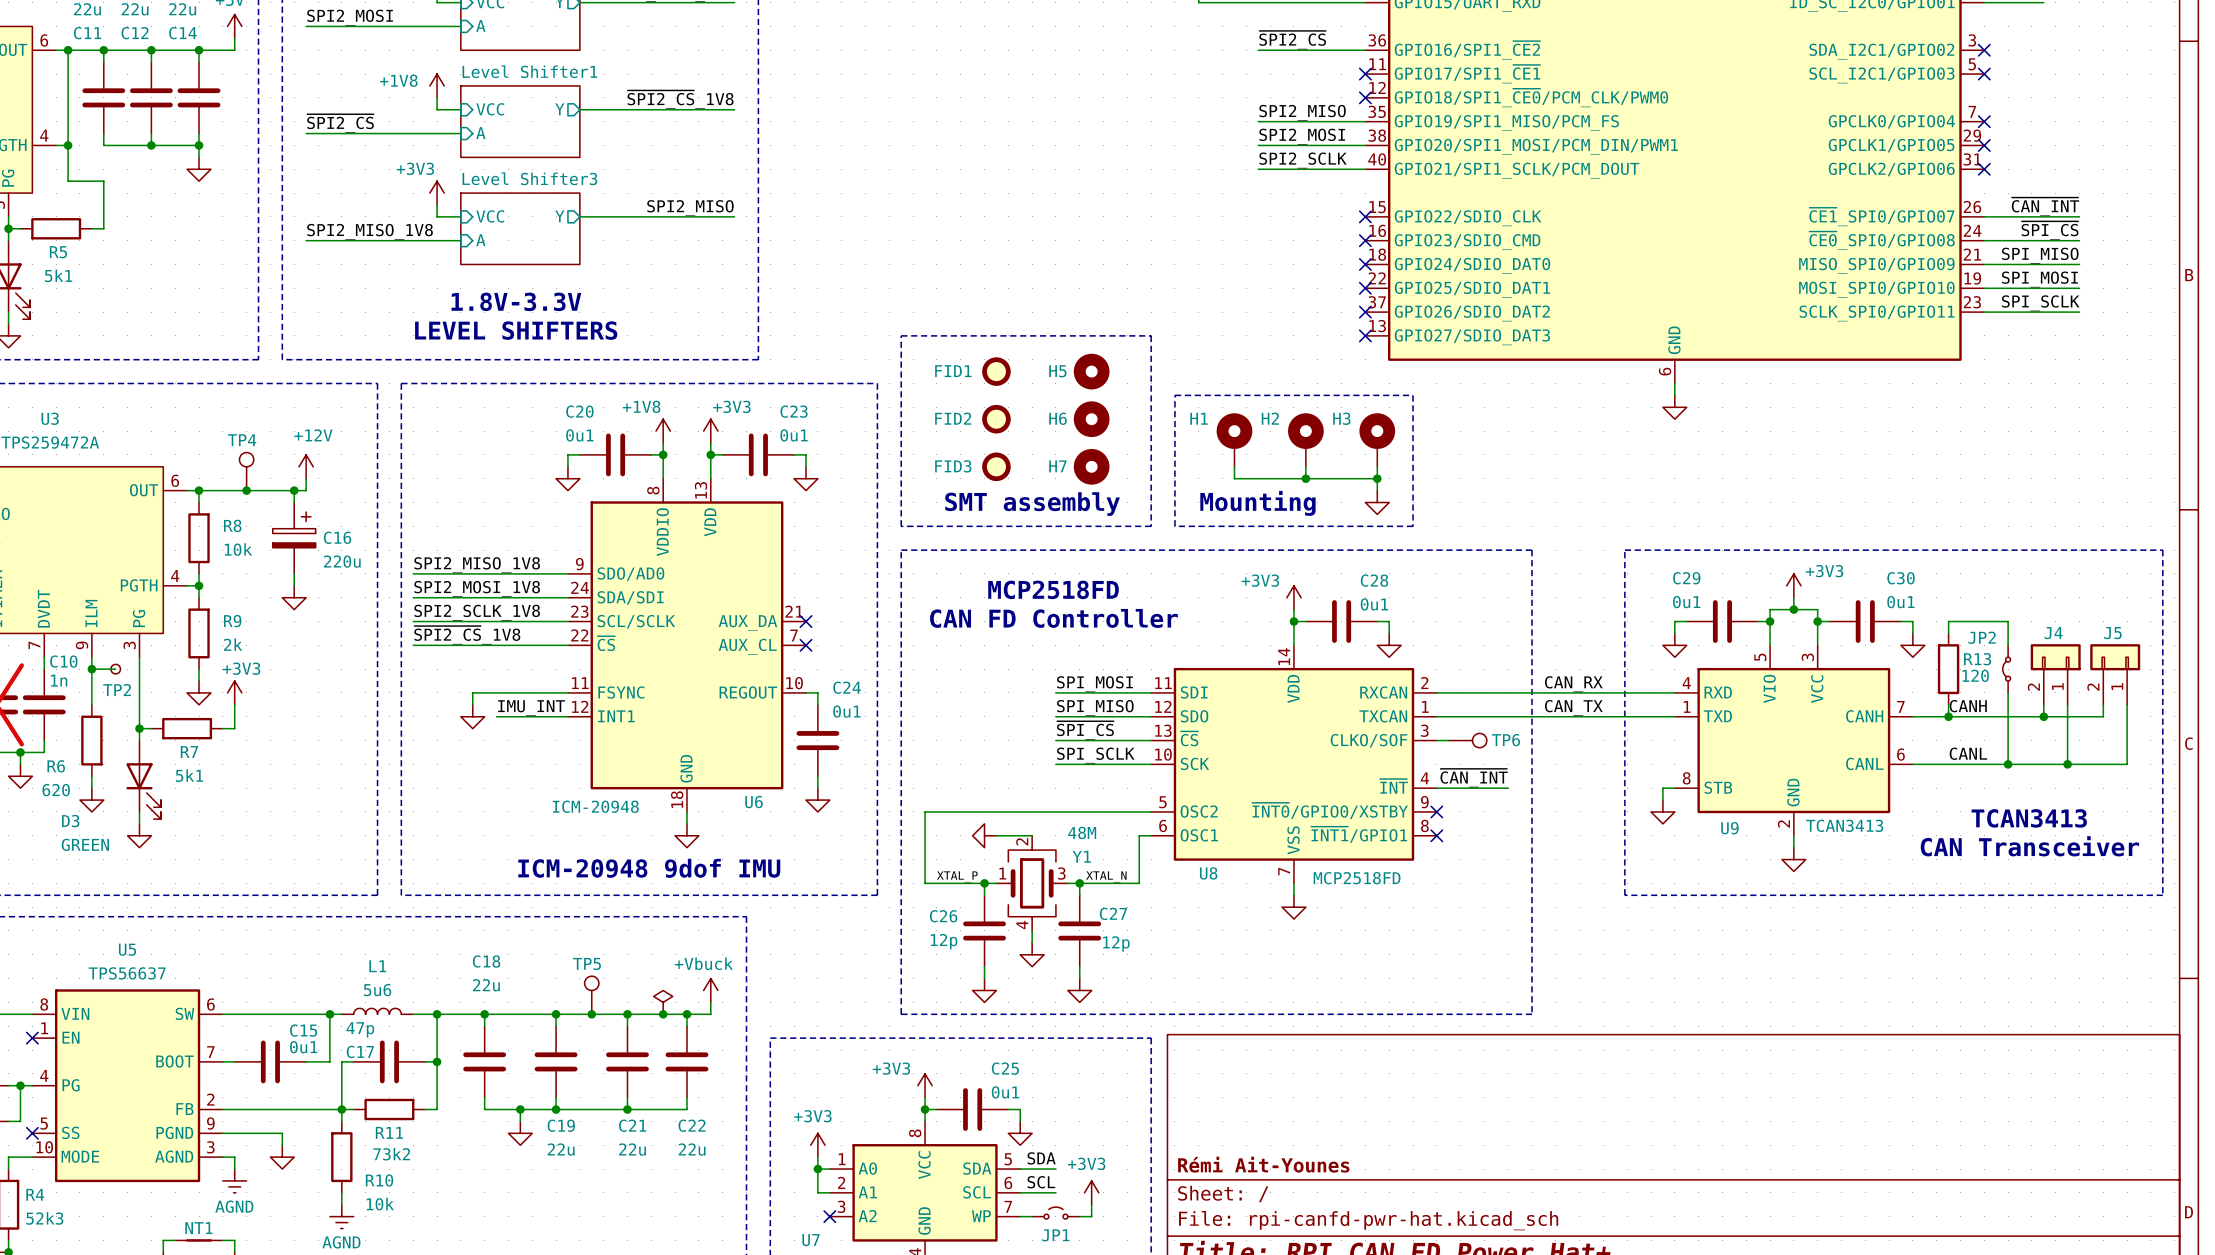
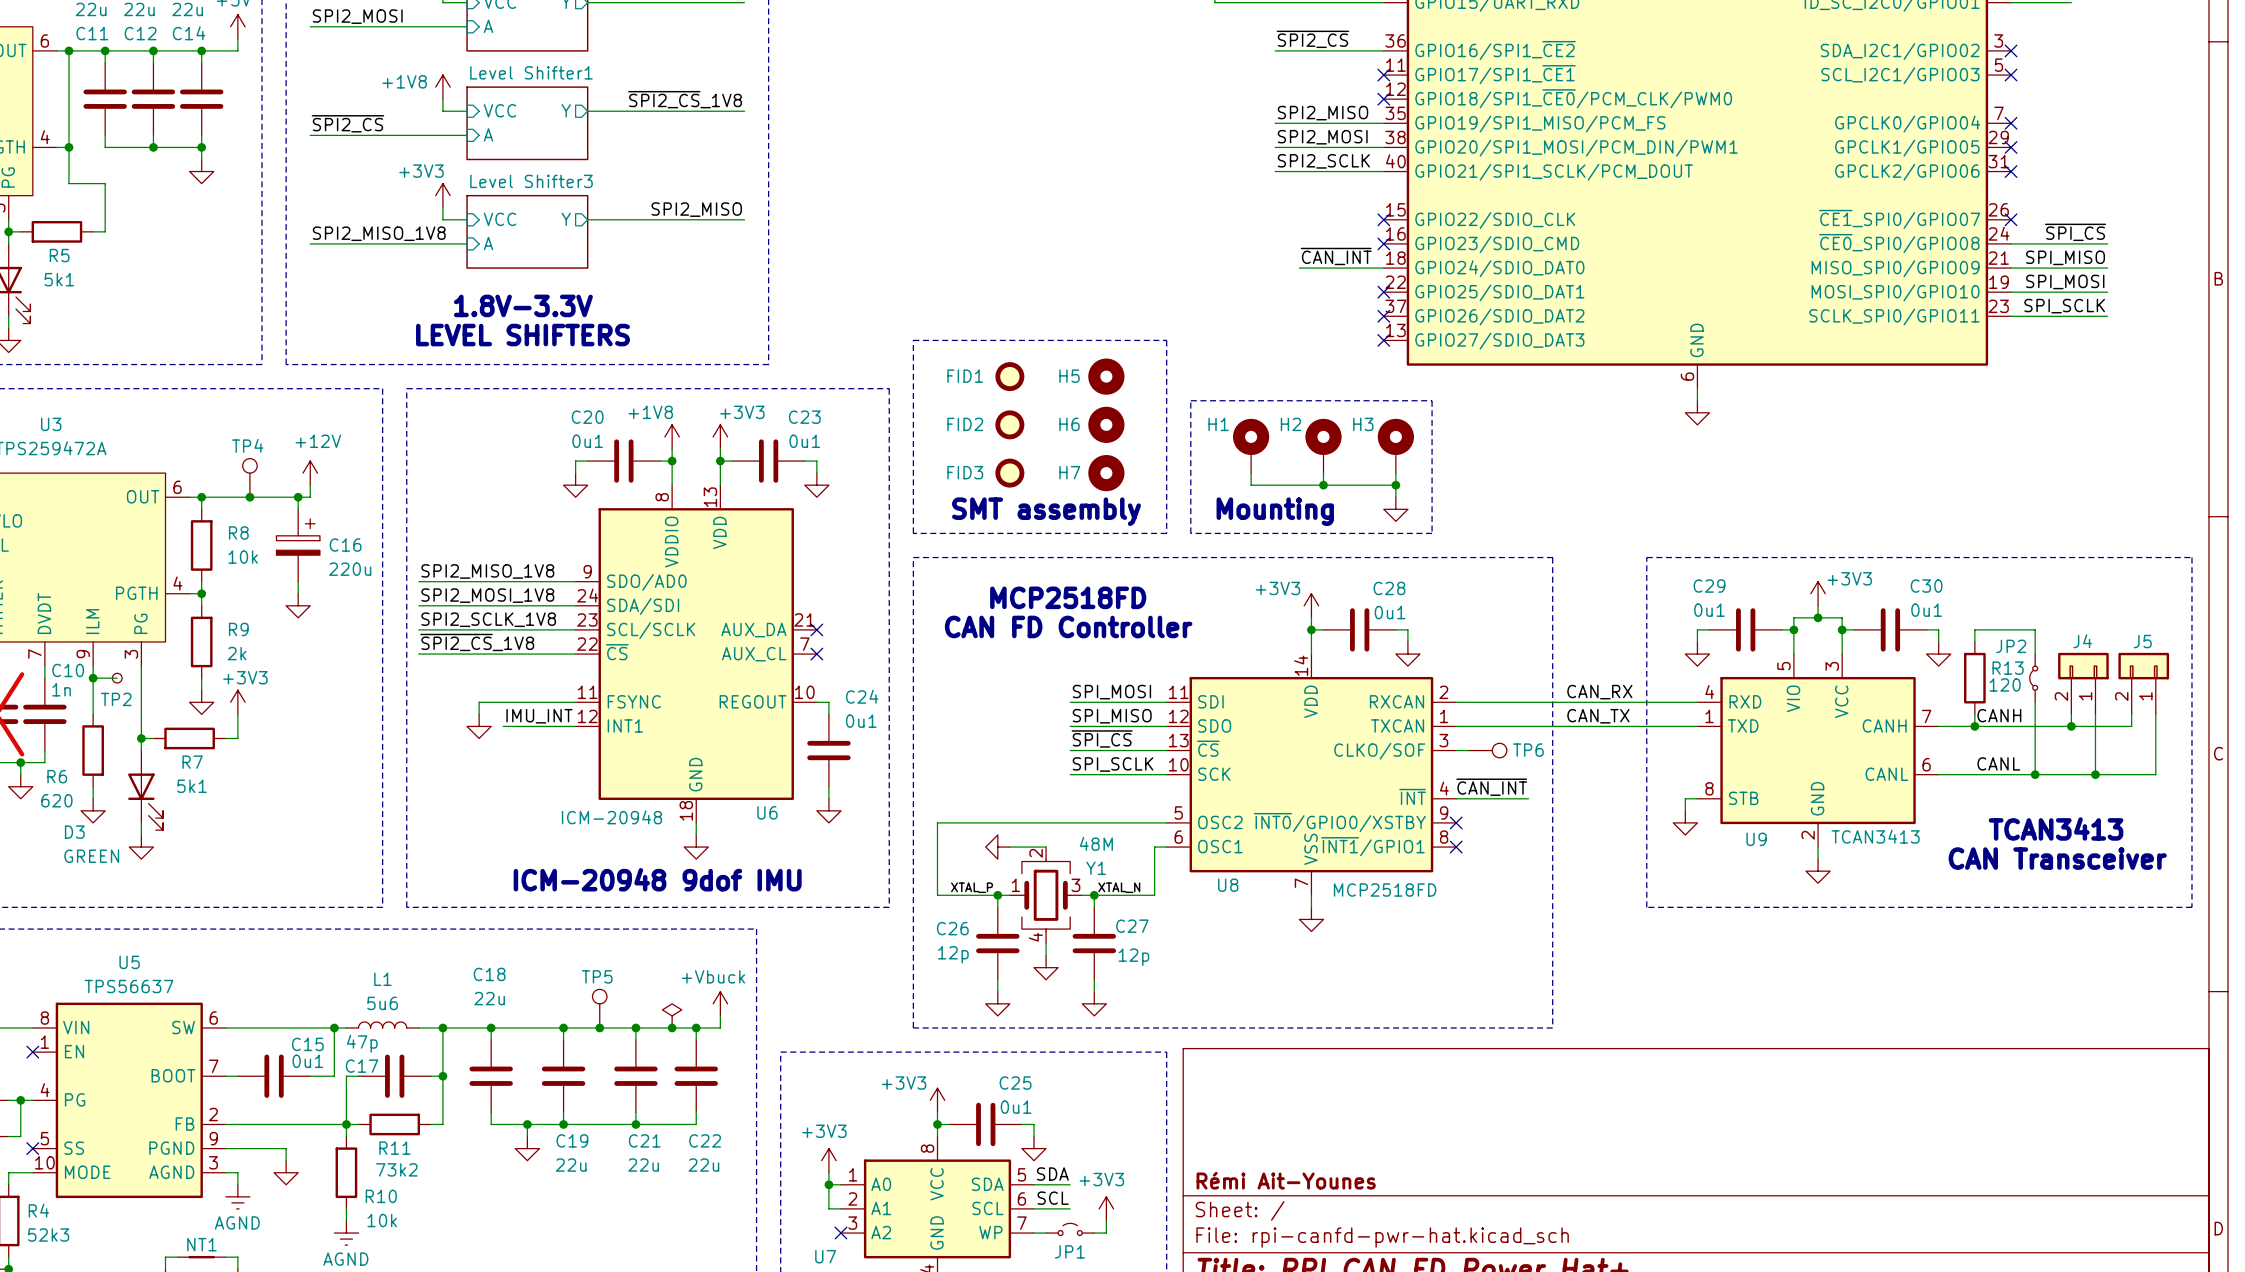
label: ~{CAN_INT} (2045, 206) -> none
wire: (1984, 216) (2079, 216) -> none
no-connect mark: none -> (2011, 219)
label: none -> ~{CAN_INT} (1336, 256)
wire: none -> (1299, 268) (1383, 268)
no-connect mark: (1365, 264) -> none

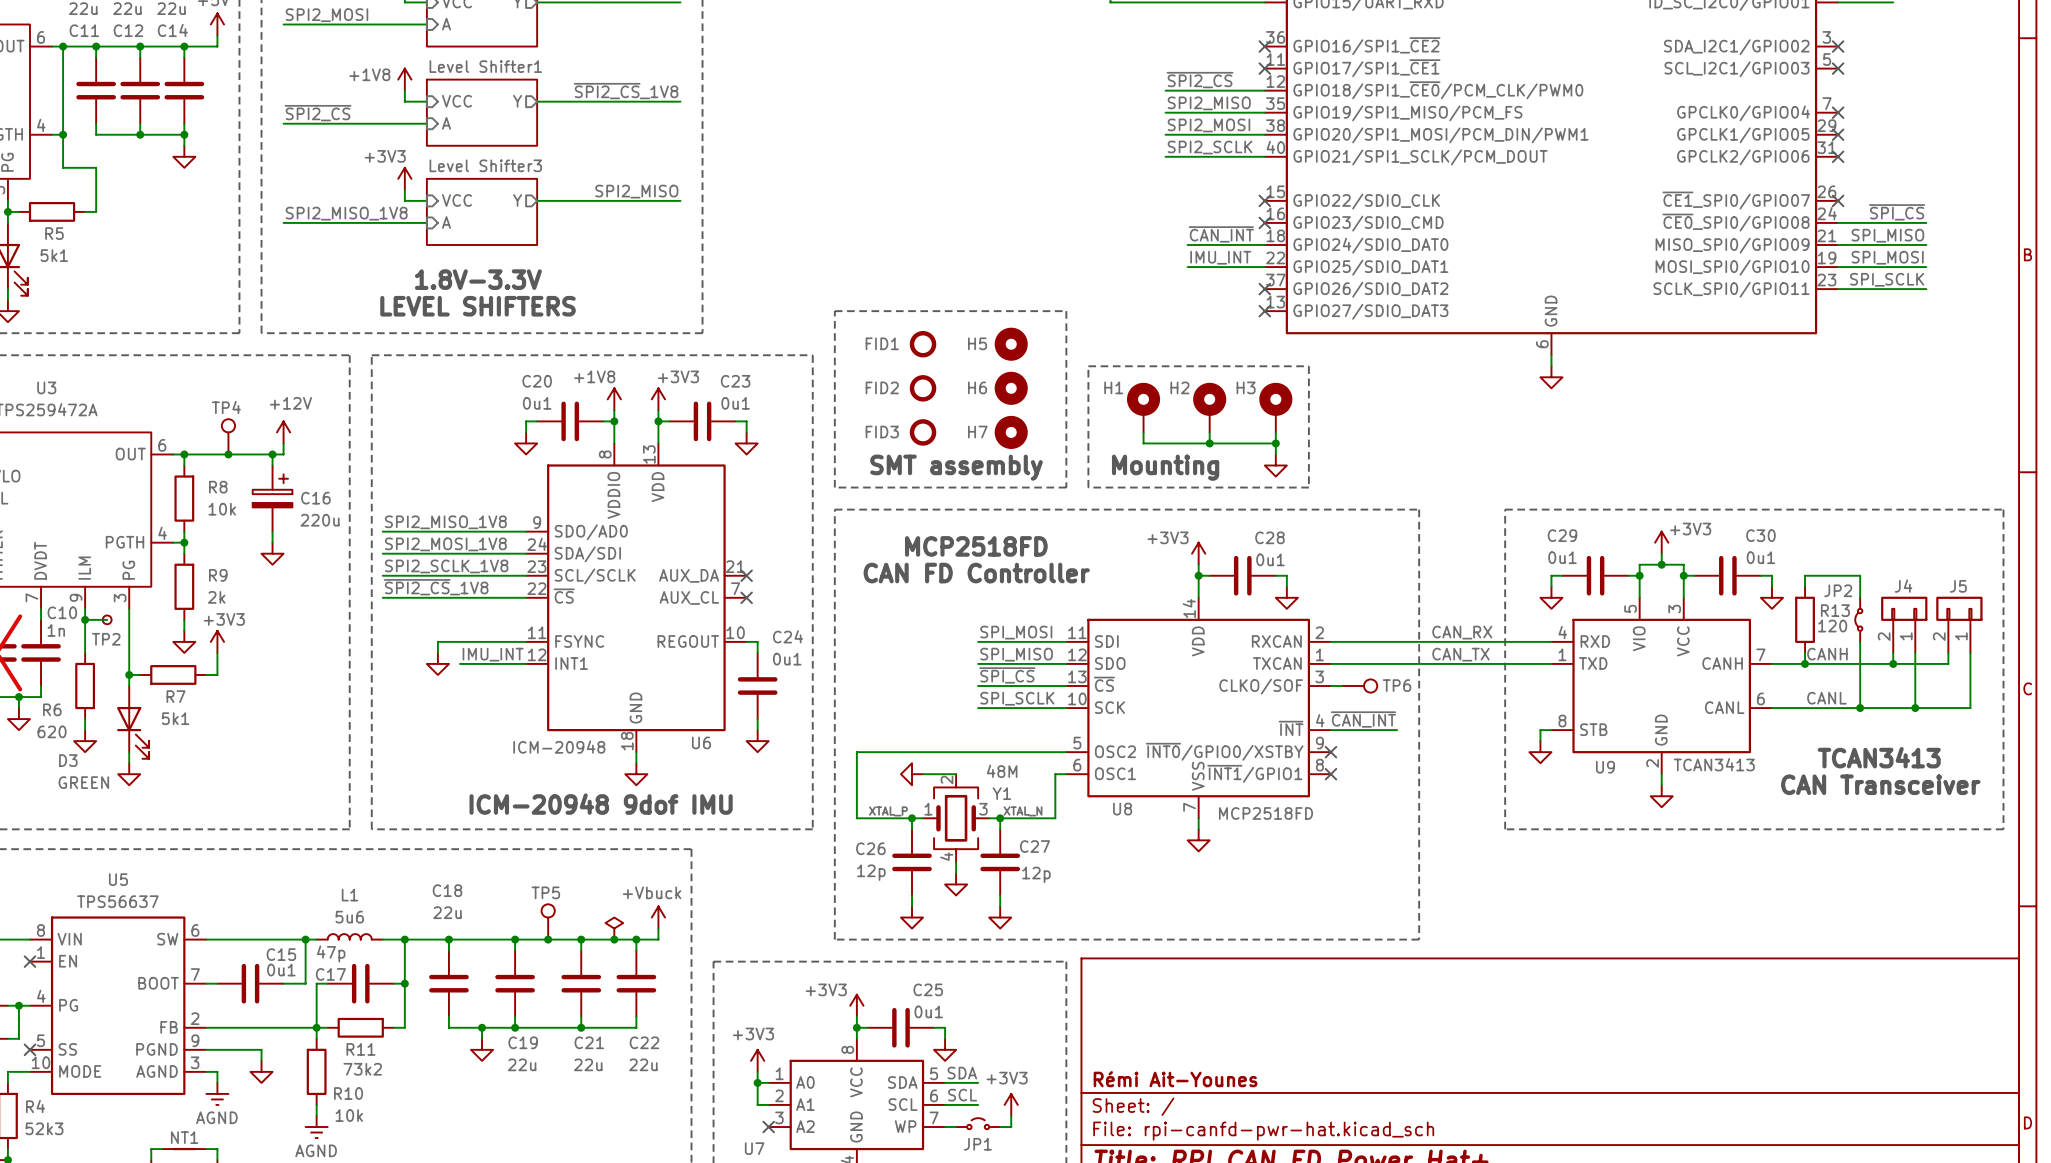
label position: ~{SPI2_CS} (1312, 39) -> ~{SPI2_CS} (1200, 80)
wire: (1275, 50) (1383, 50) -> (1165, 90) (1264, 90)
no-connect mark position: (1383, 99) -> (1264, 46)
label: none -> IMU_INT (1220, 257)
wire: none -> (1187, 267) (1264, 267)
no-connect mark: (1383, 292) -> none

